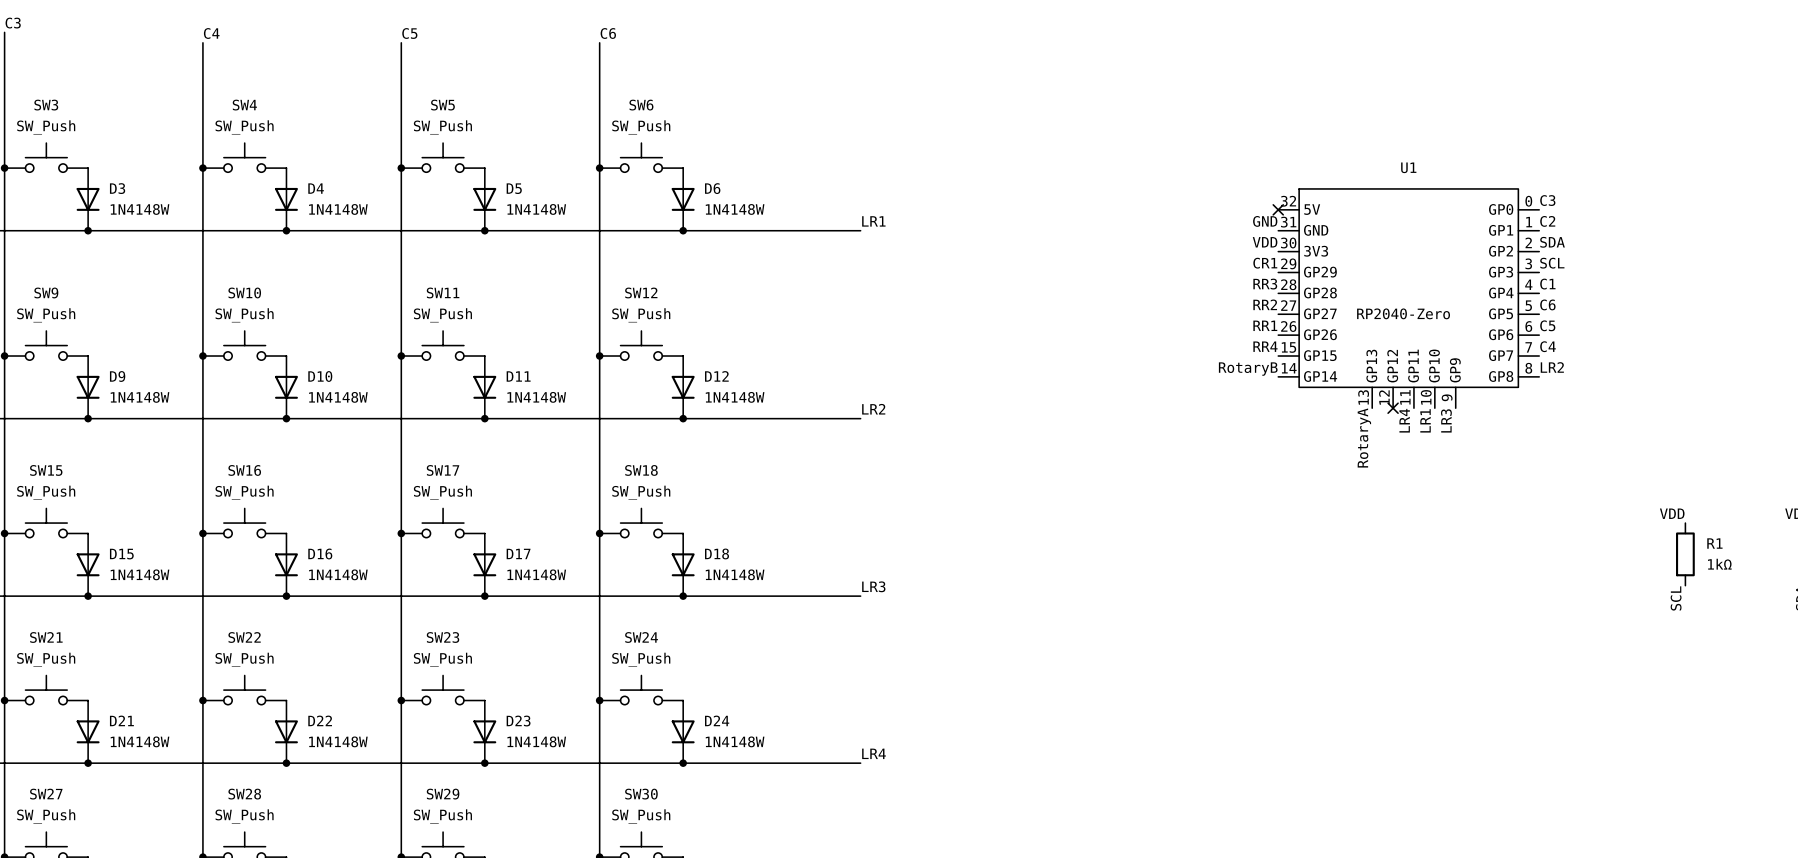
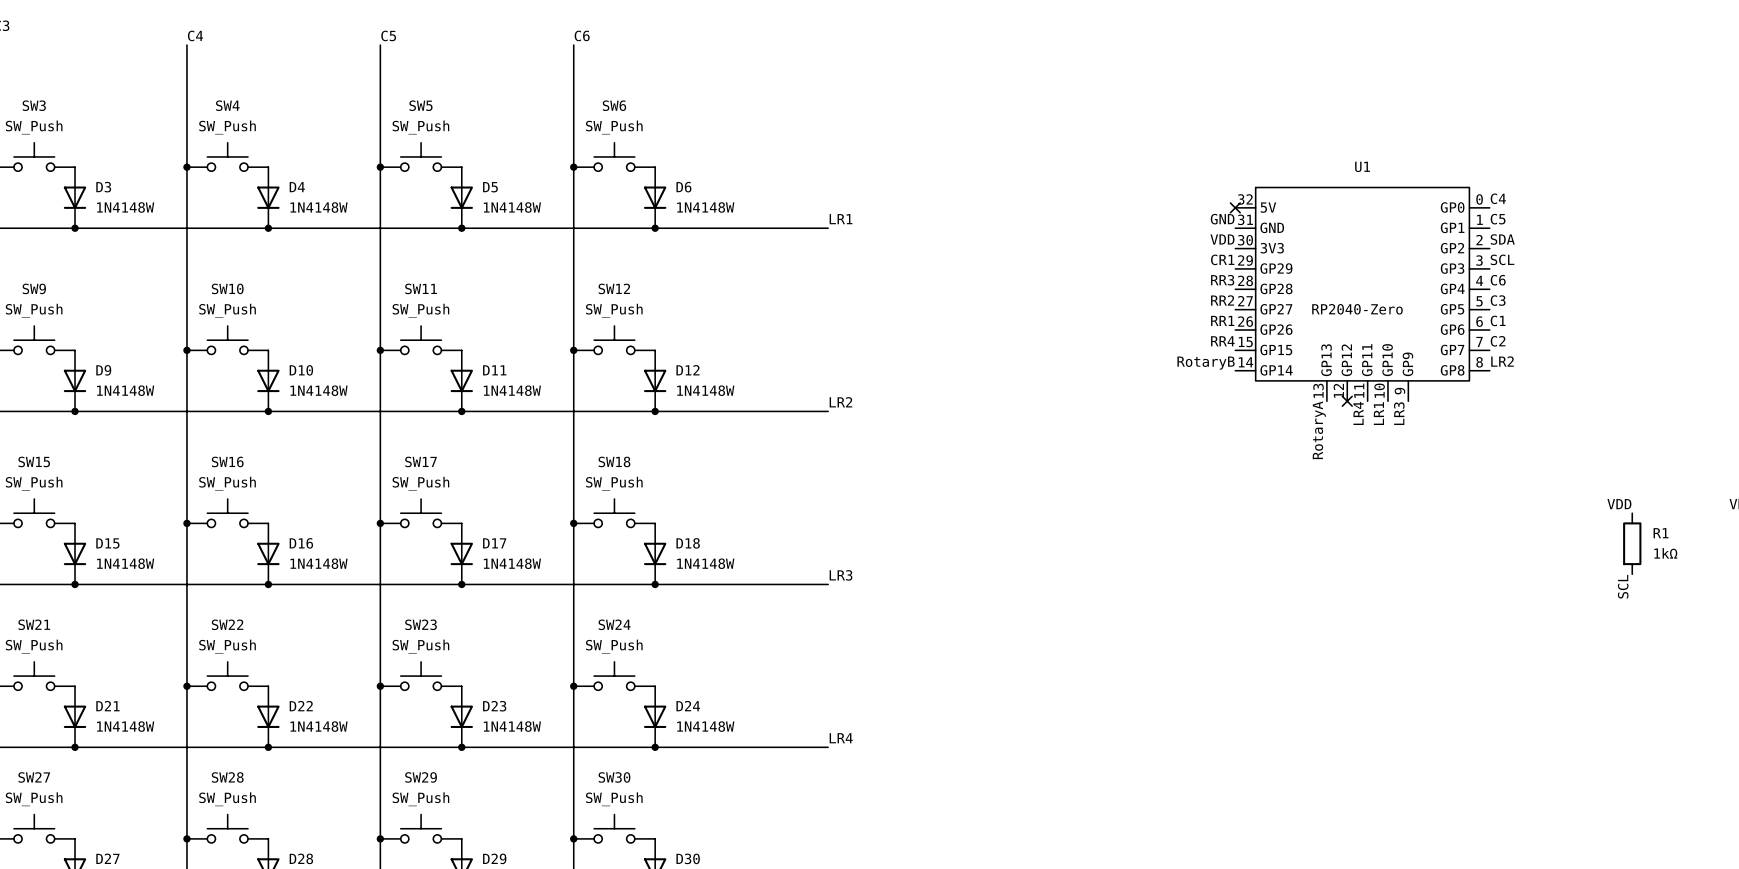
label: C3 (1547, 200) -> C4 (1498, 198)
label: C2 (1547, 221) -> C5 (1498, 219)
label: C1 (1547, 284) -> C6 (1498, 280)
label: C6 (1547, 304) -> C3 (1498, 300)
label: C5 (1547, 325) -> C1 (1498, 320)
label: C4 (1548, 346) -> C2 (1498, 341)

